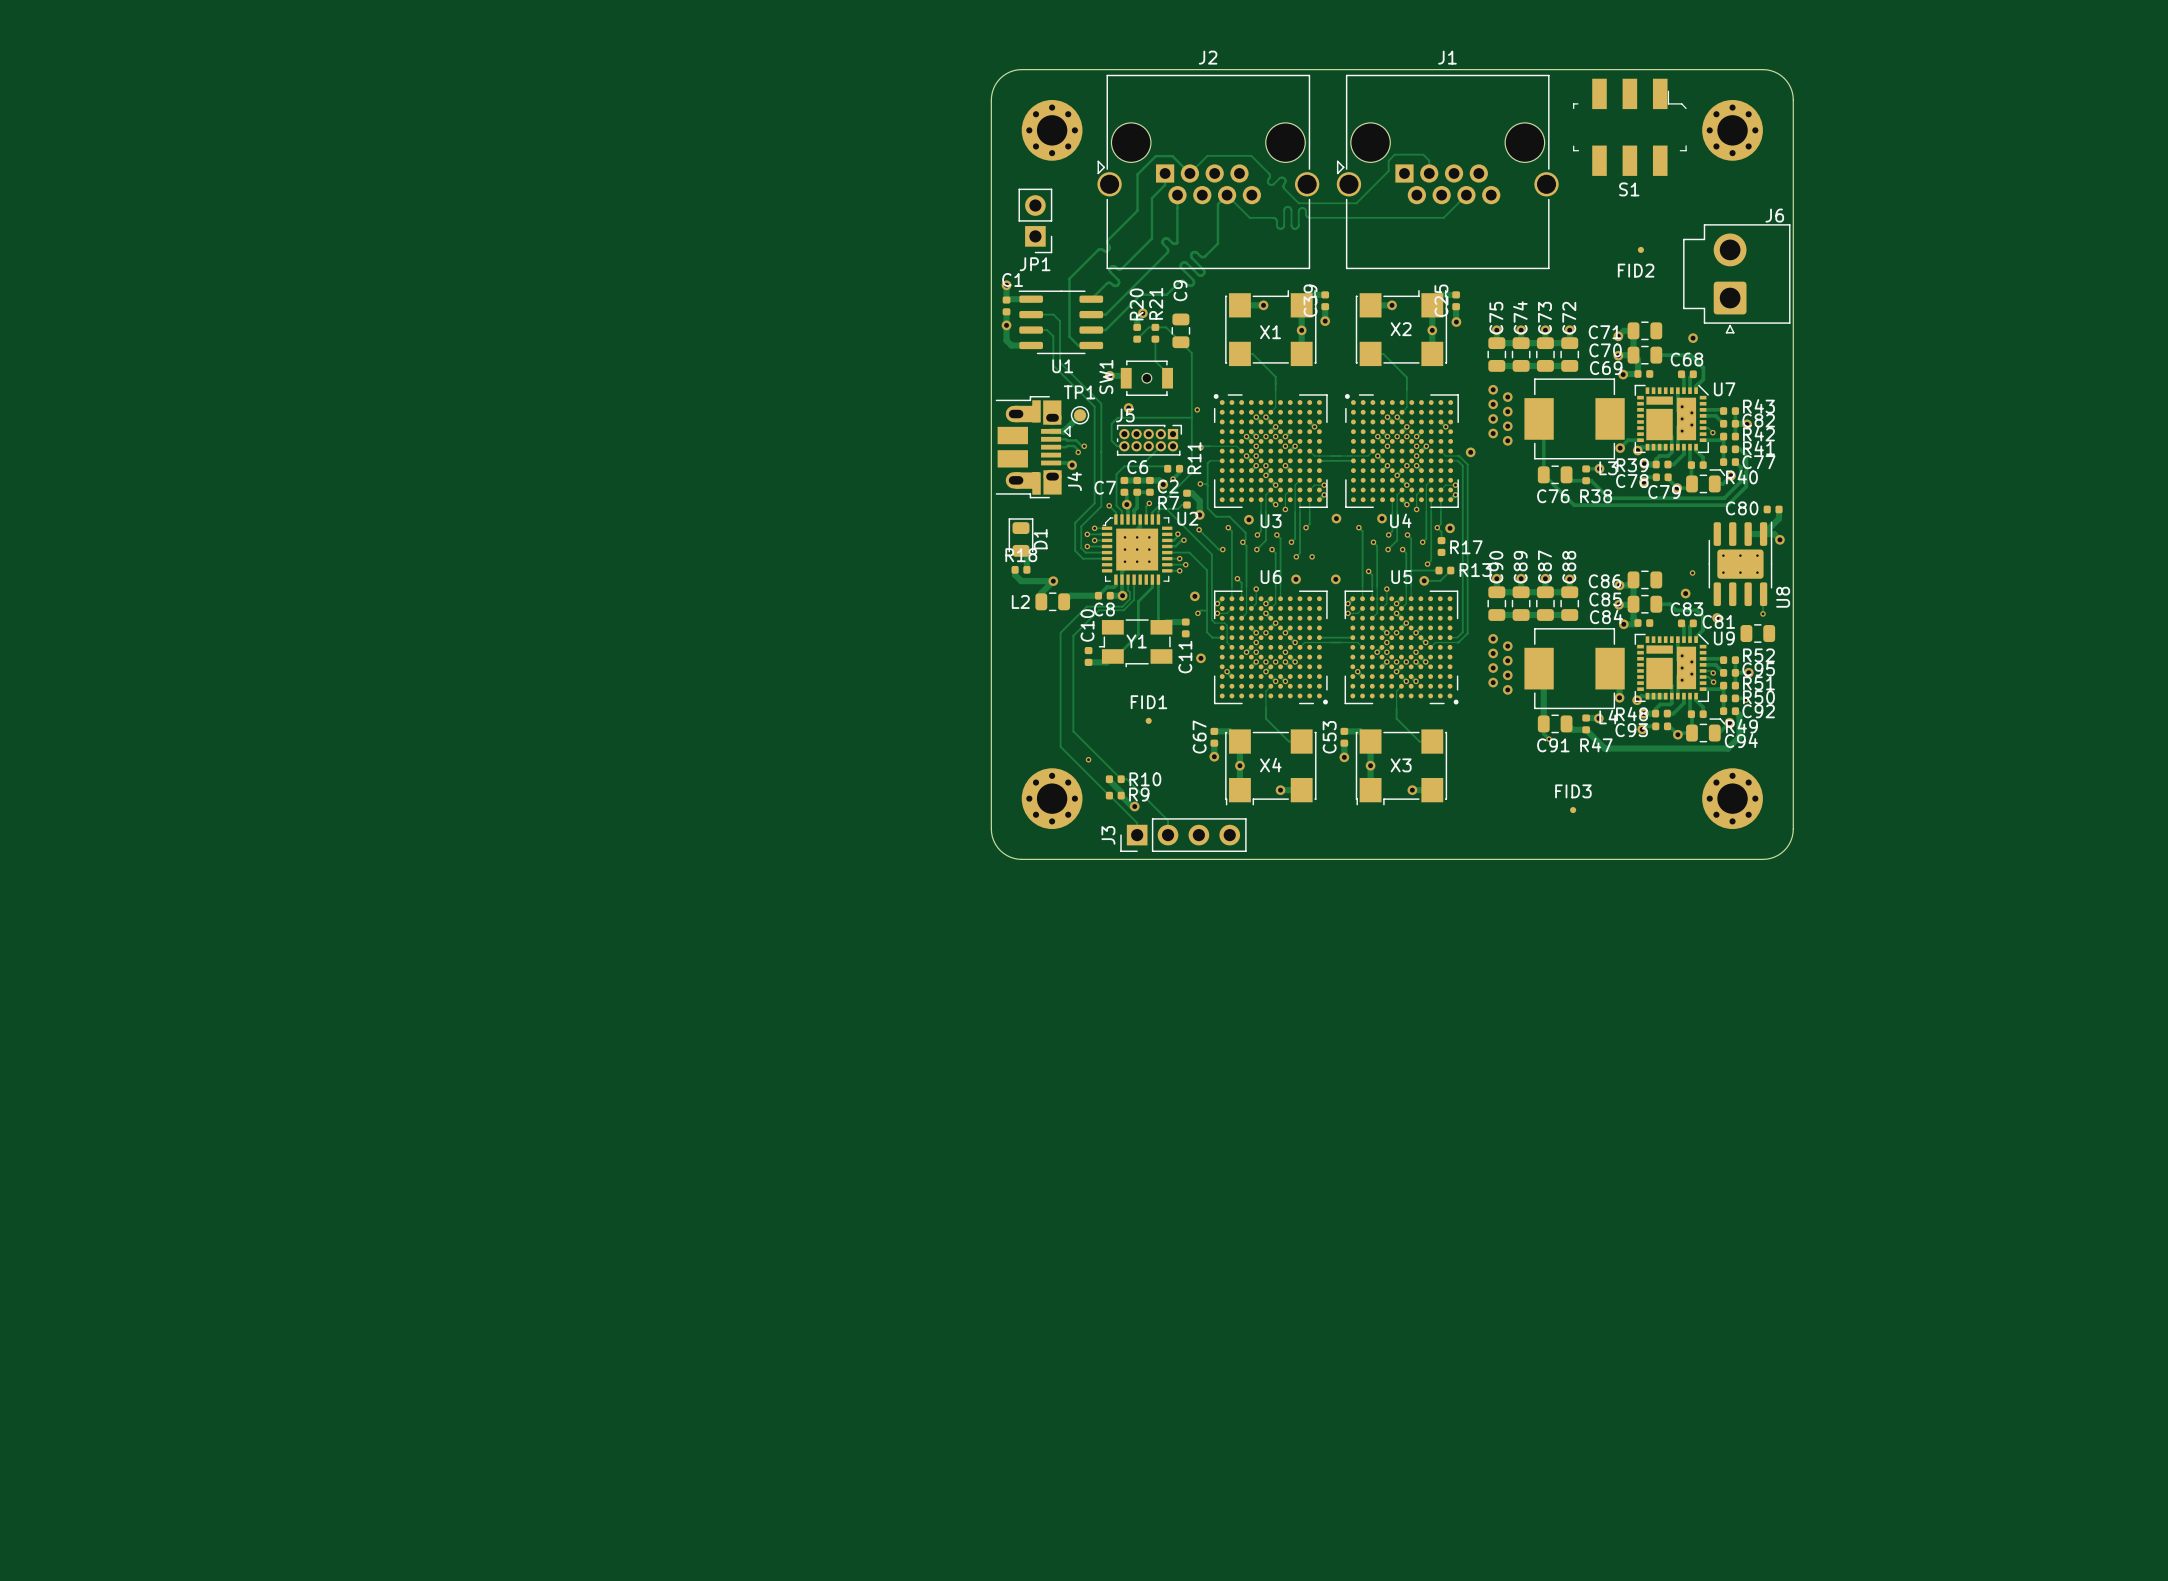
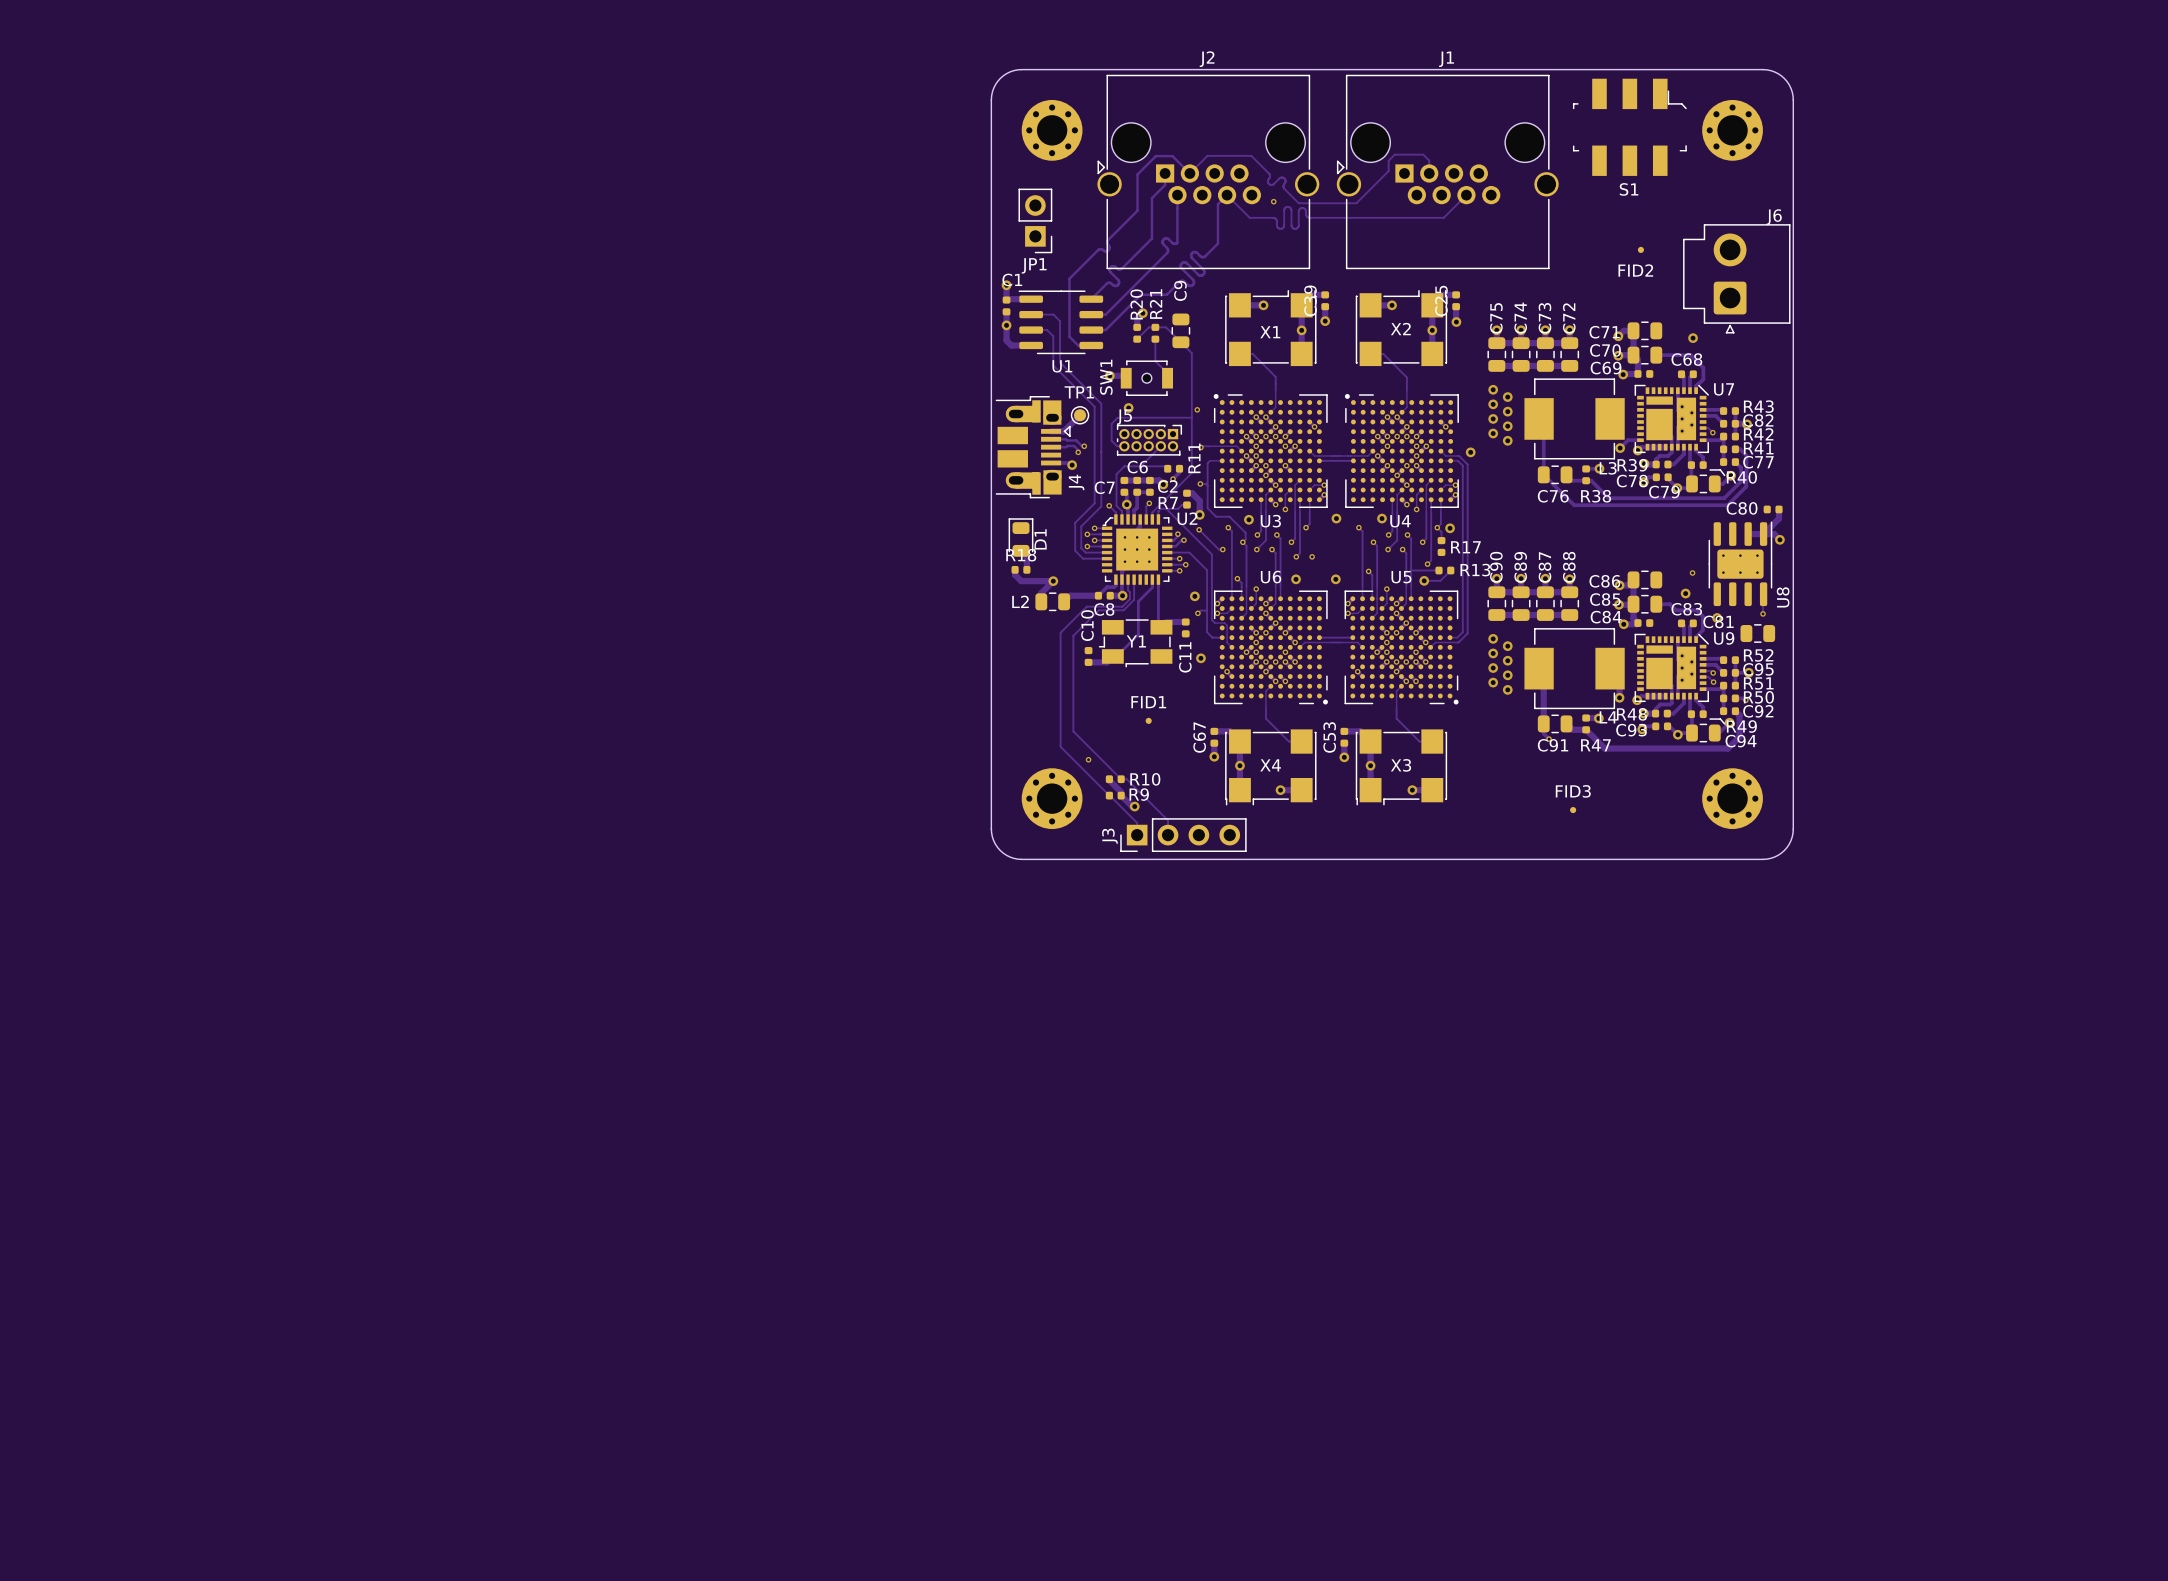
via: none -> (1273, 201)

